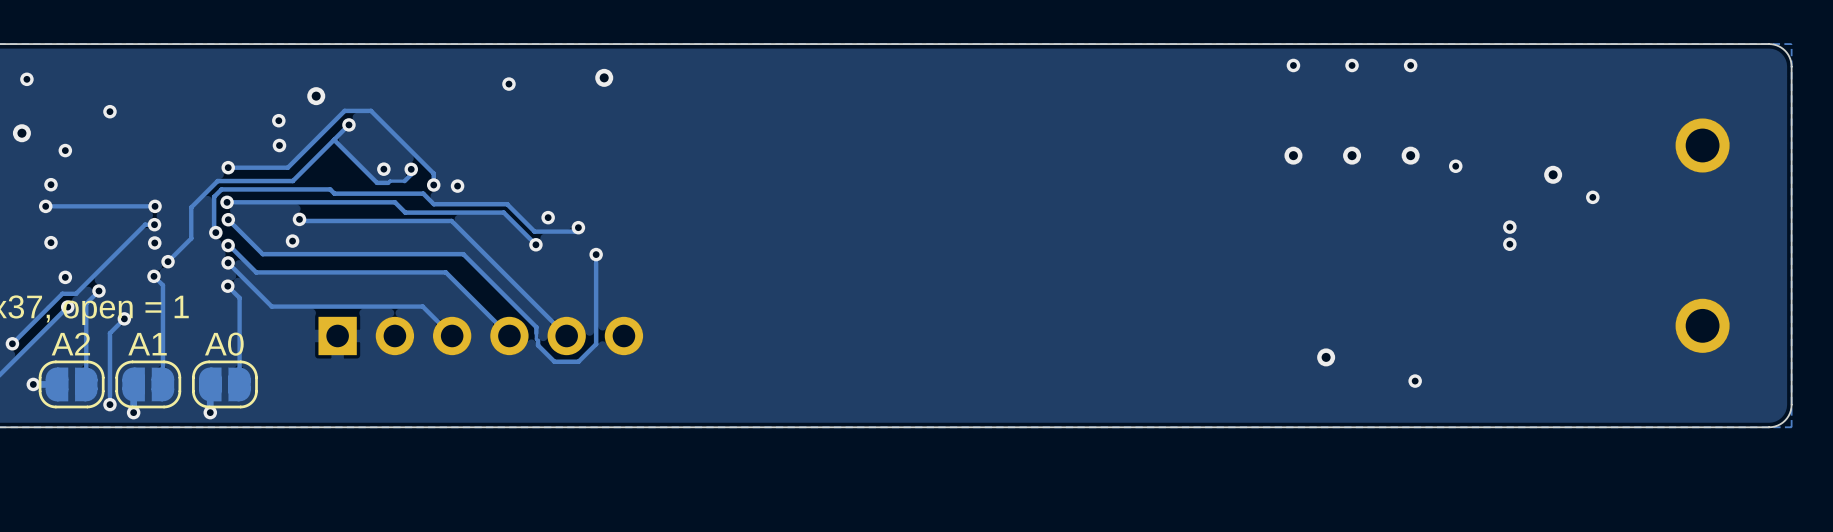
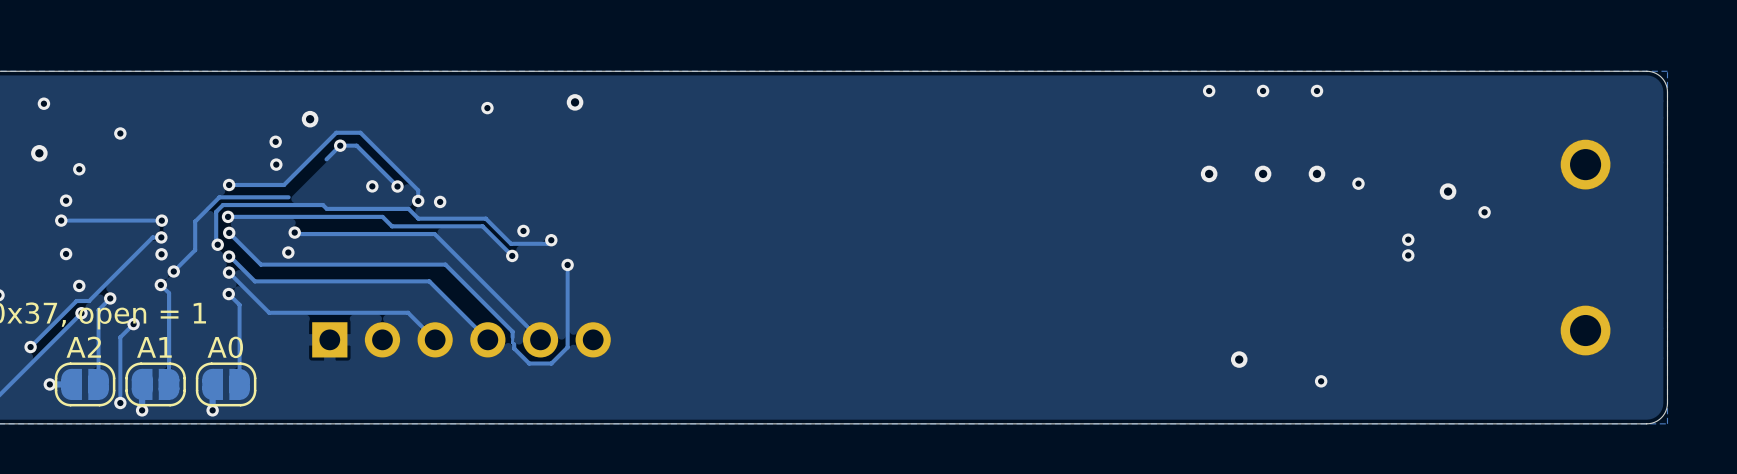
track: (411, 169) (411, 174) (404, 181) (377, 182) (334, 139) (292, 181) -> (397, 186) (356, 145) (340, 145)

